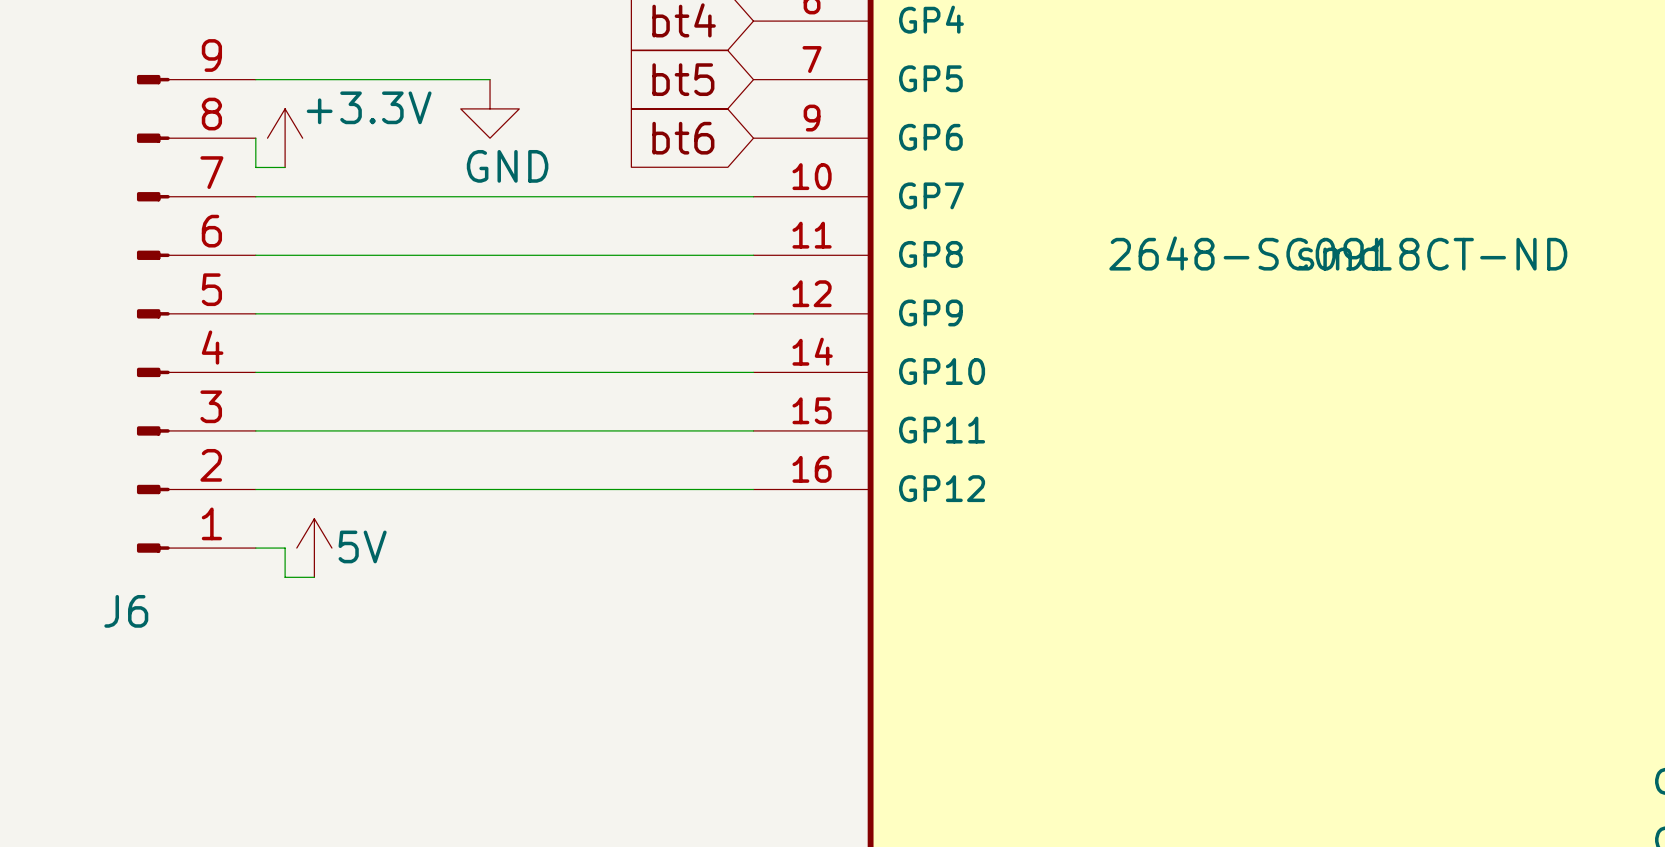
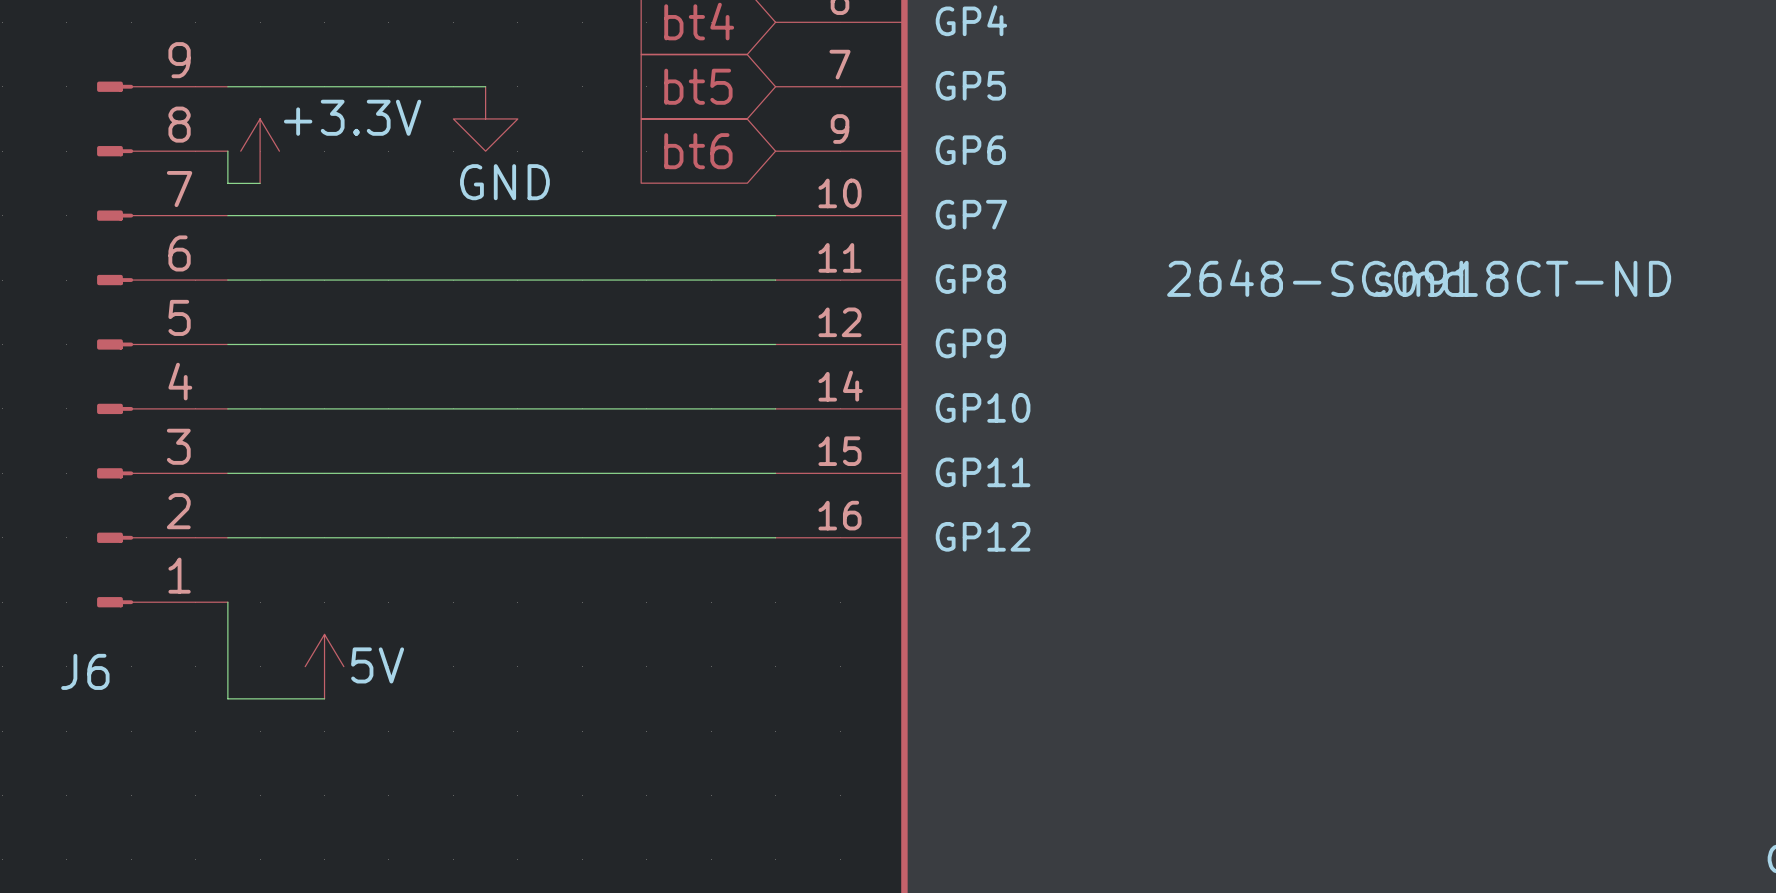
wire: (255, 548) (285, 548) (285, 577) (314, 577) -> (227, 602) (227, 698) (324, 698)
power symbol position: 5V (314, 548) -> 5V (324, 666)

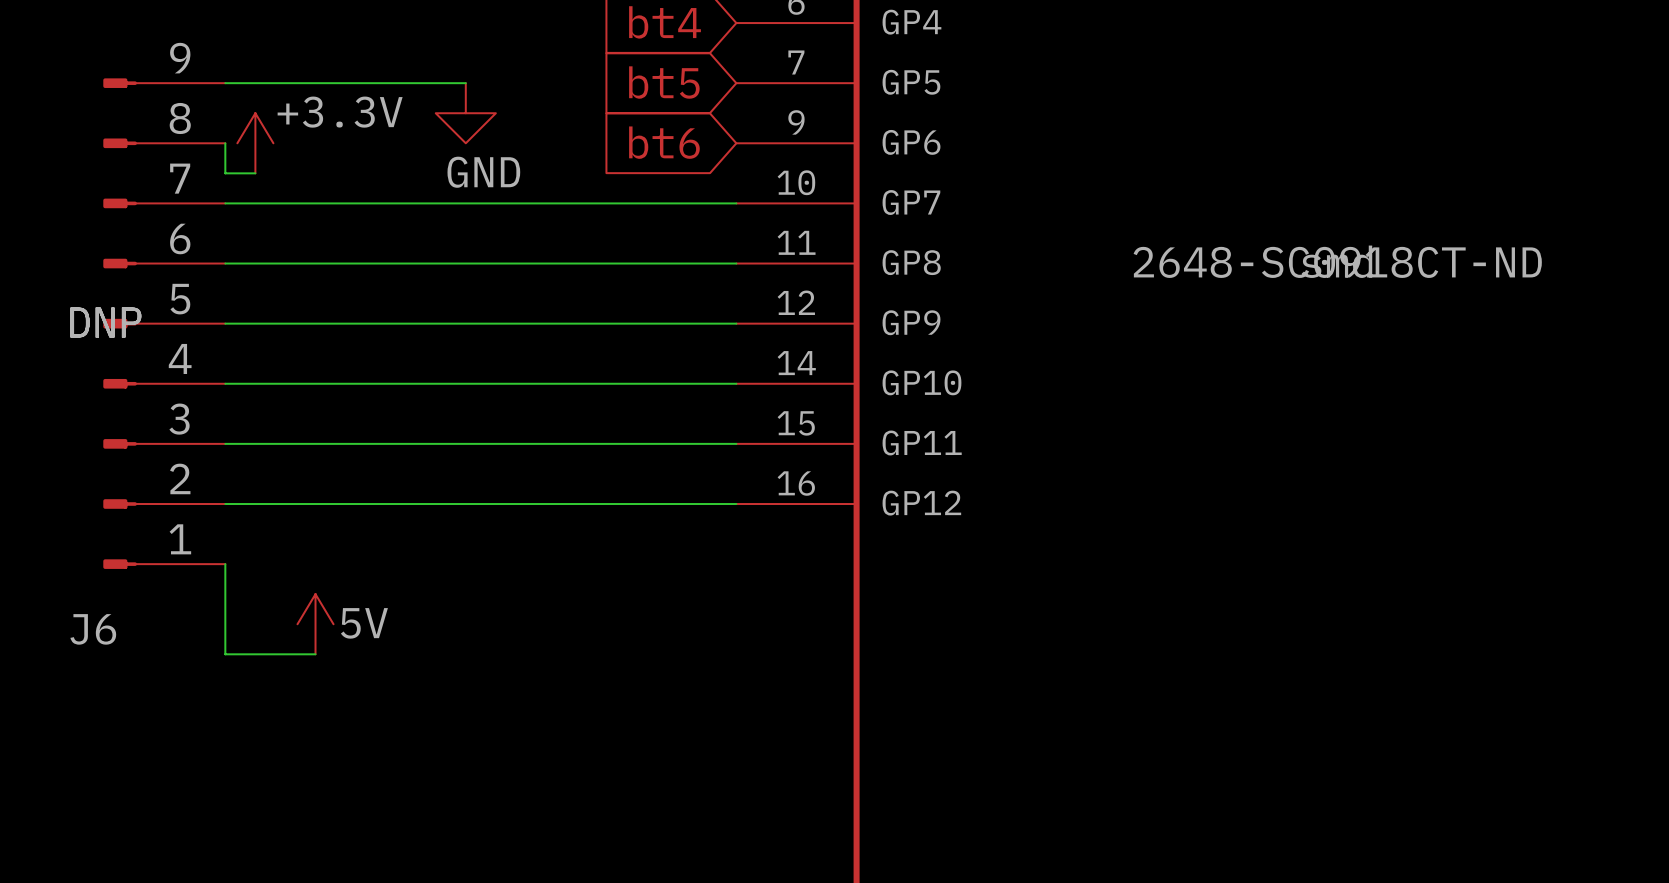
J6 text: none -> DNP (105, 322)
J6 text: none -> DNP (105, 322)

